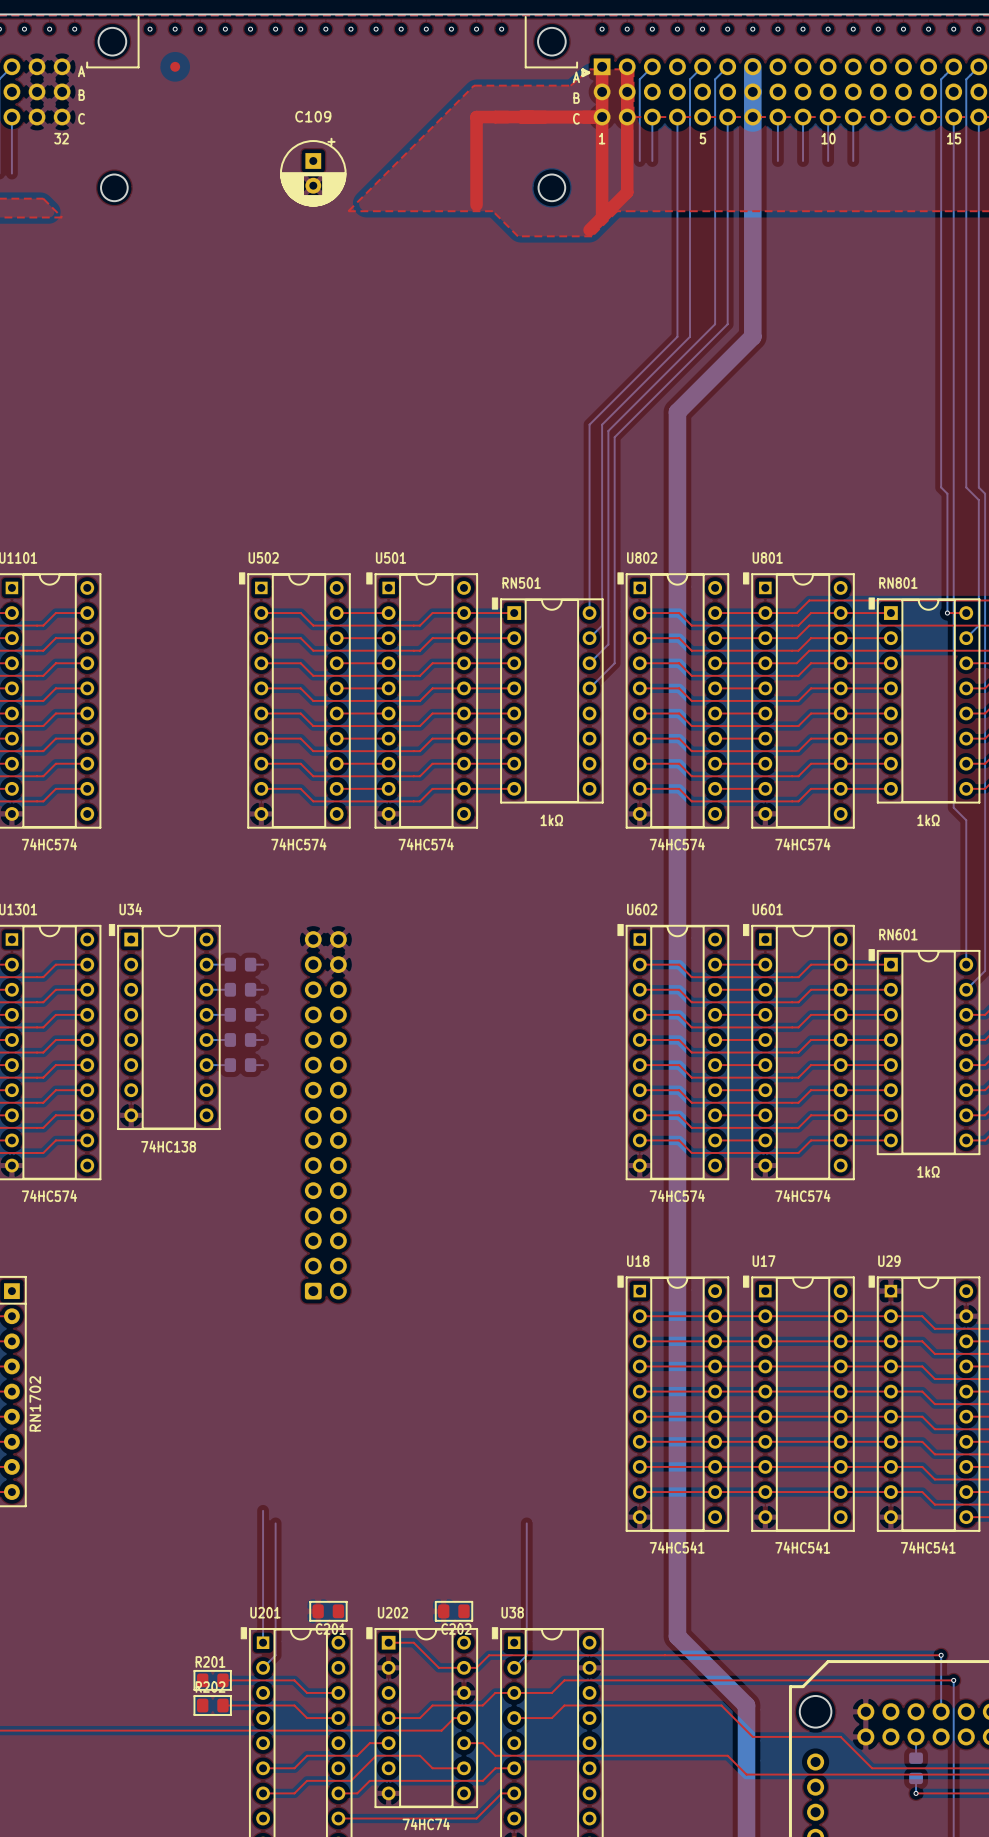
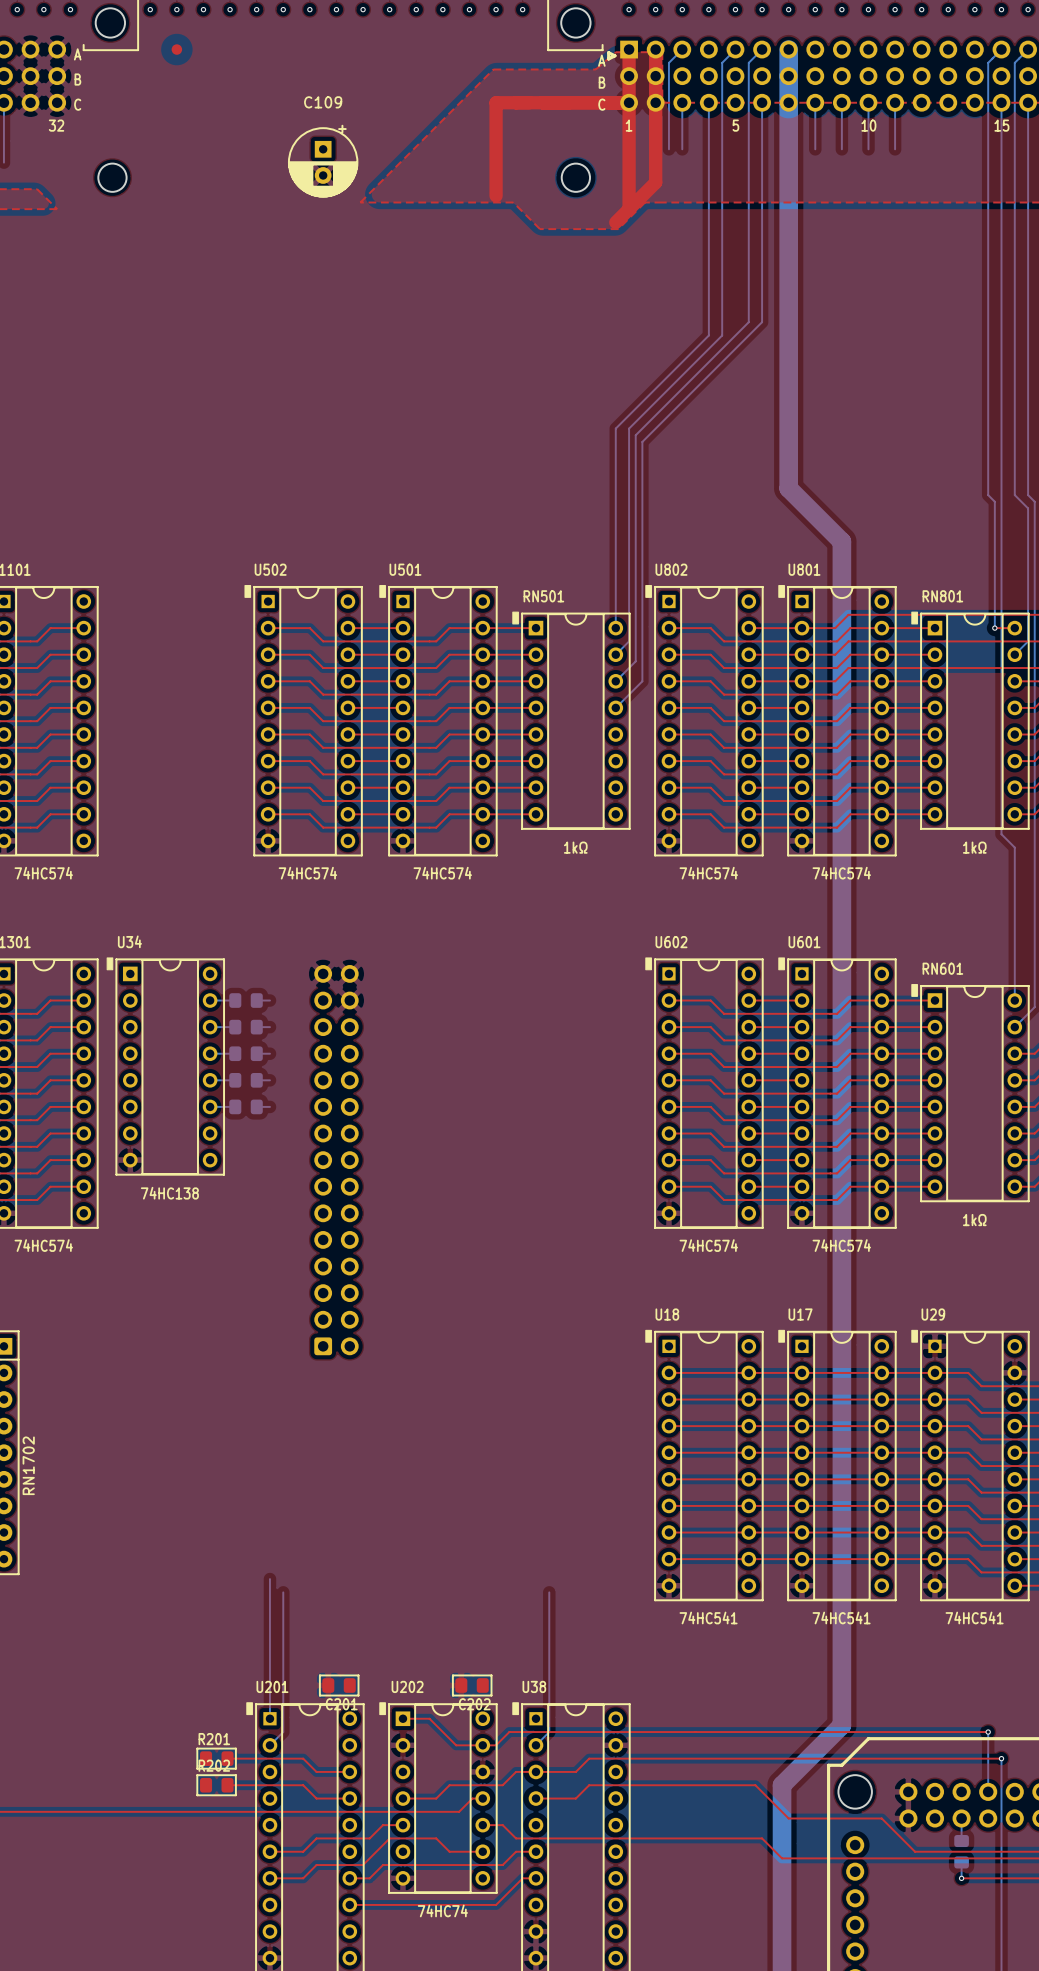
bottom track: (752, 336) (677, 412) (677, 1636) (746, 1705) -> (788, 335) (788, 488) (841, 541) (841, 1725) (782, 1785)

